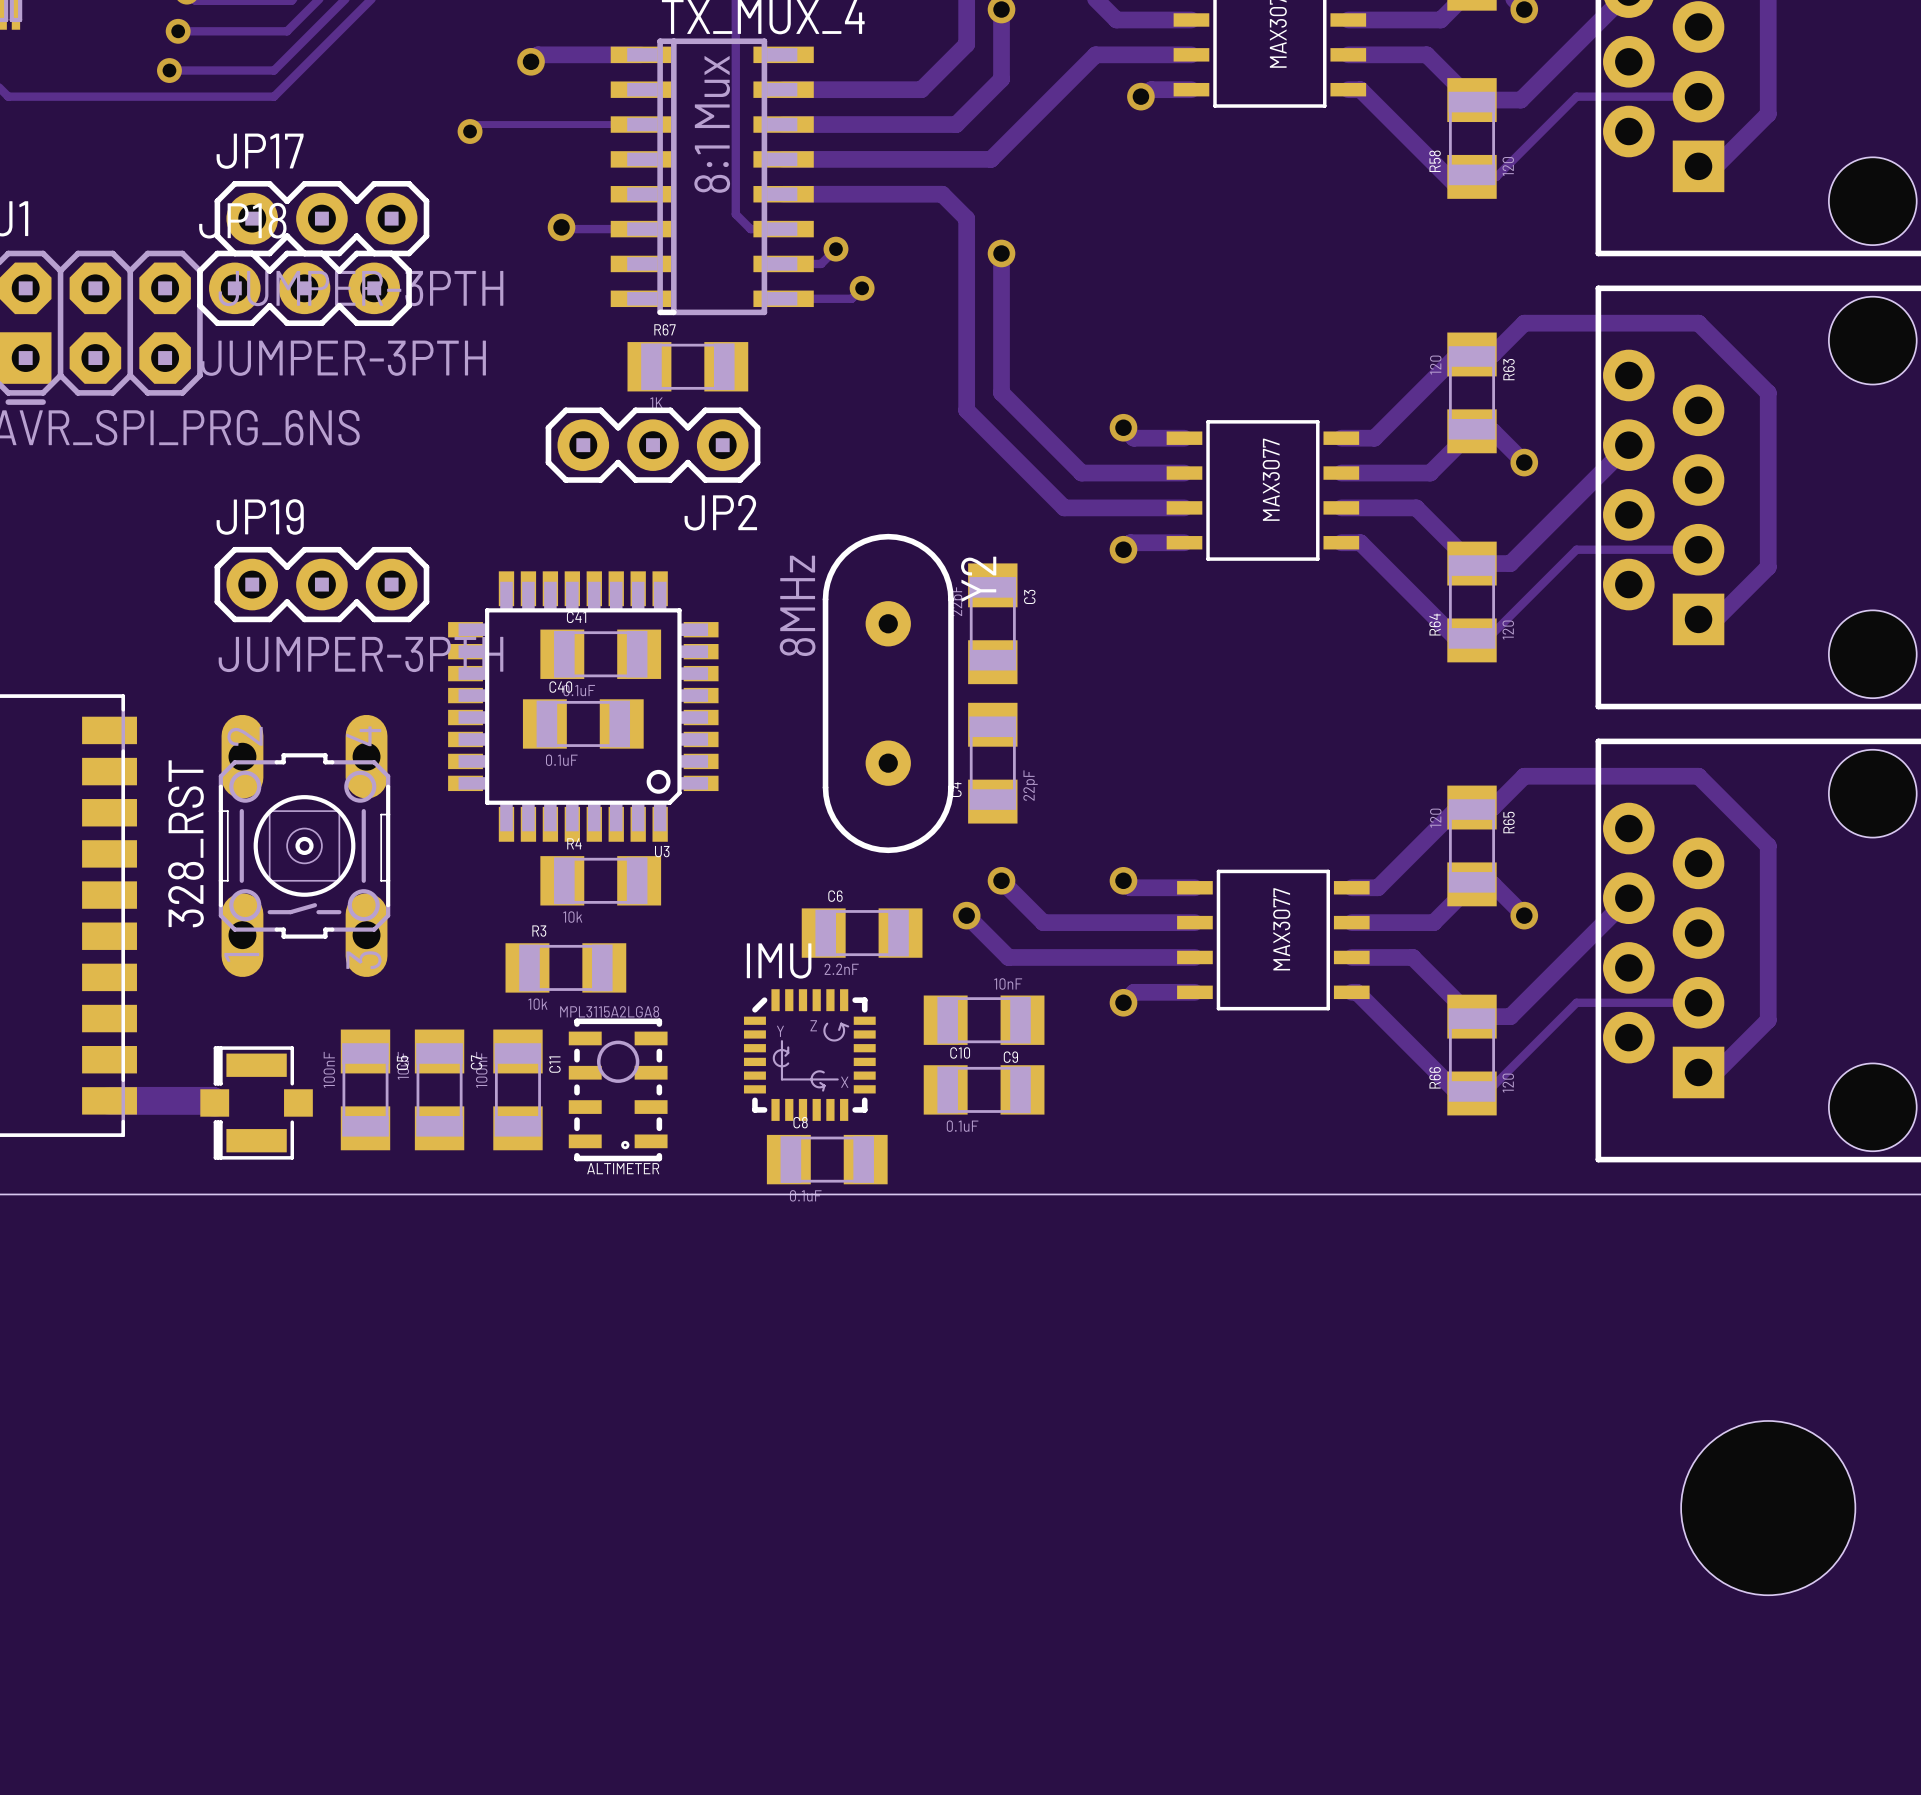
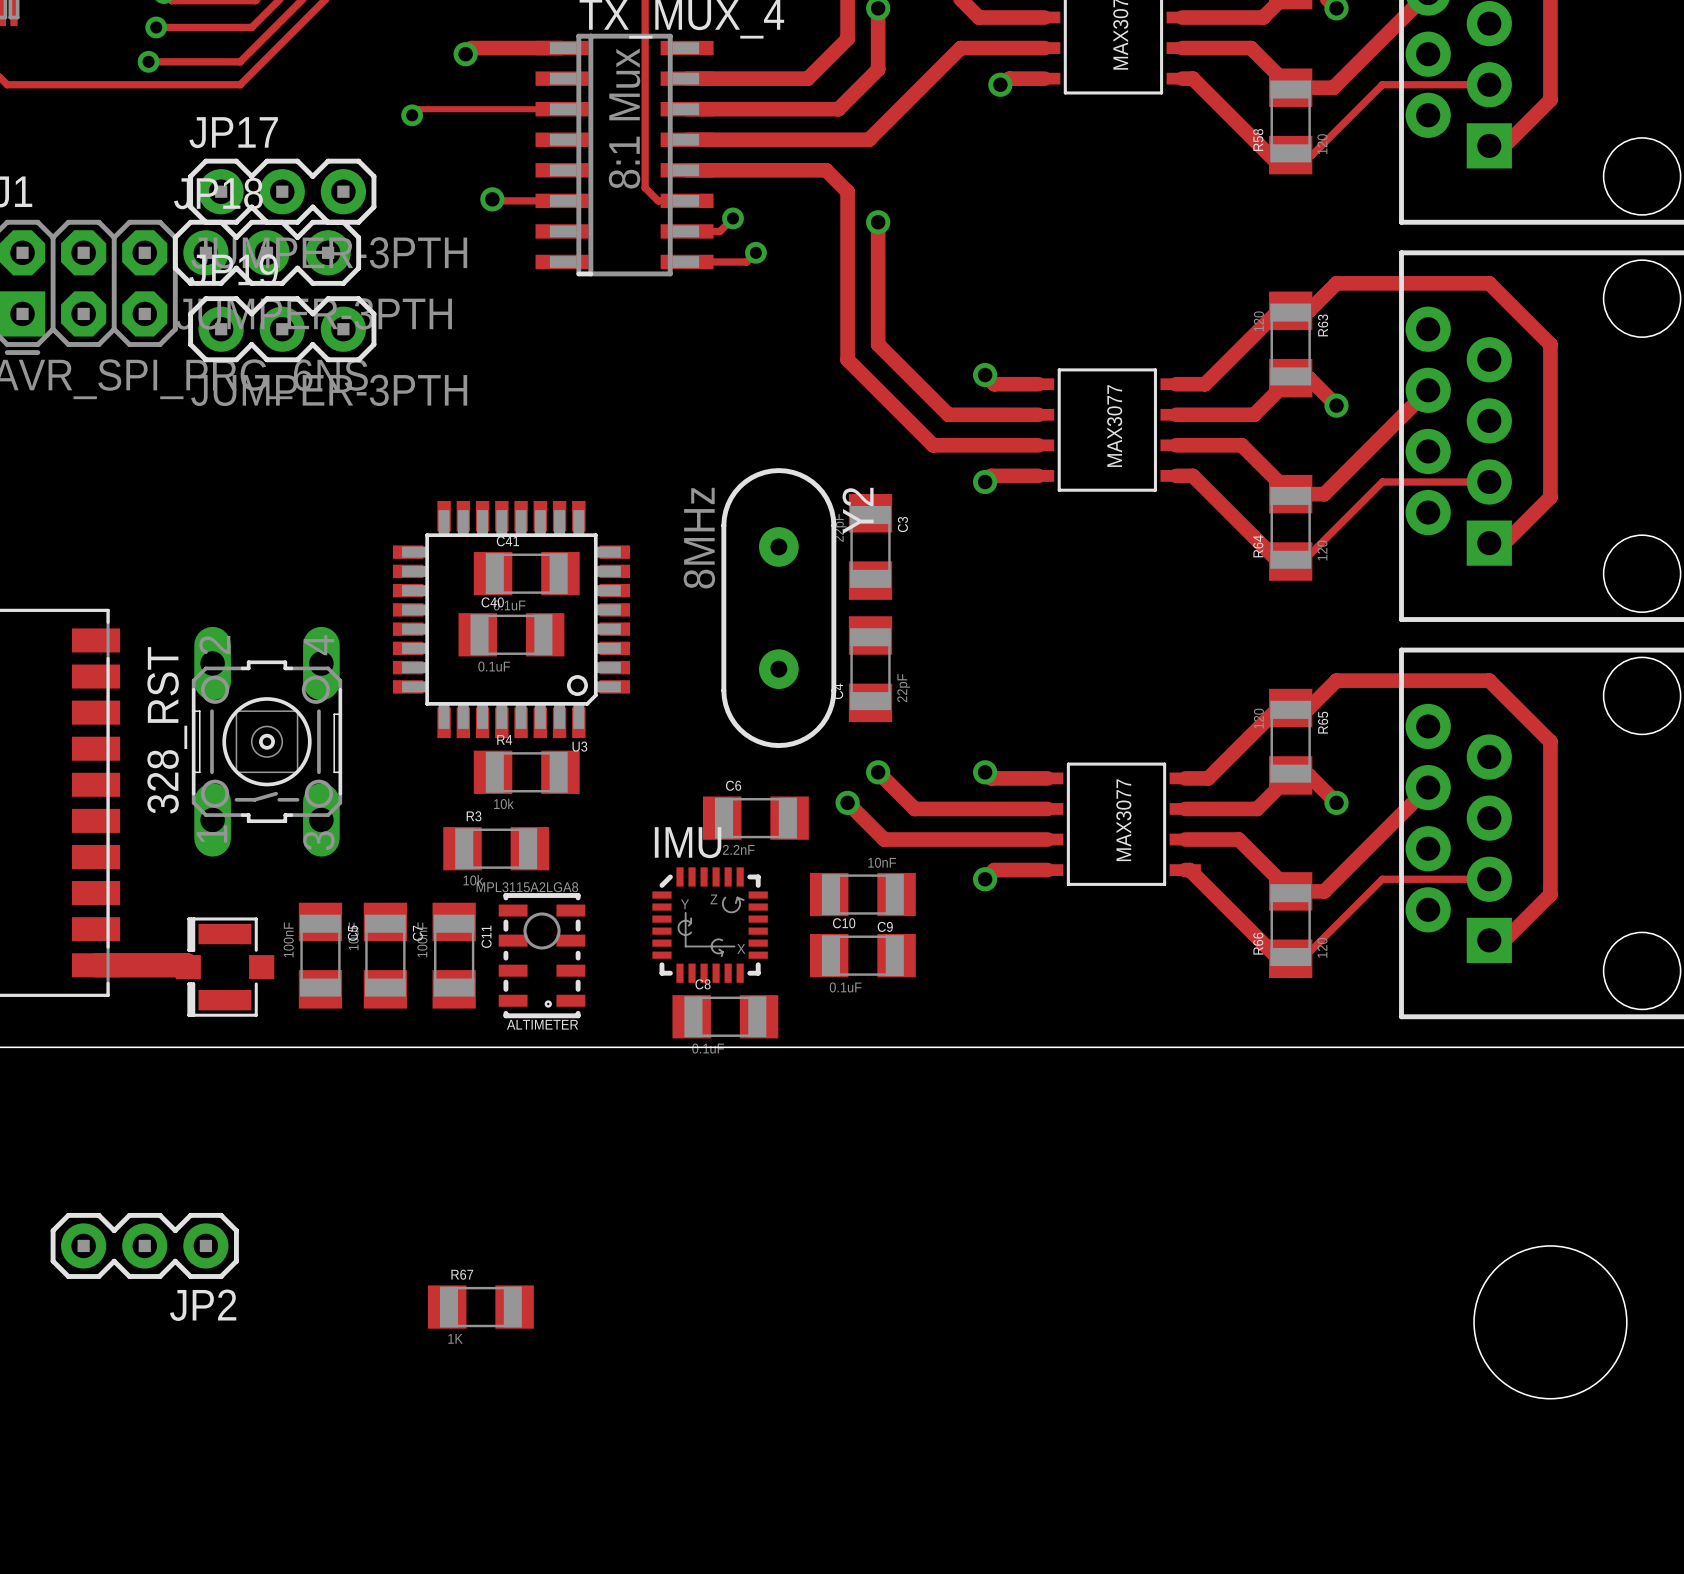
R67 position: (687, 366) -> (480, 1307)
JP2 position: (653, 445) -> (144, 1245)
JP19 position: (321, 584) -> (282, 329)

